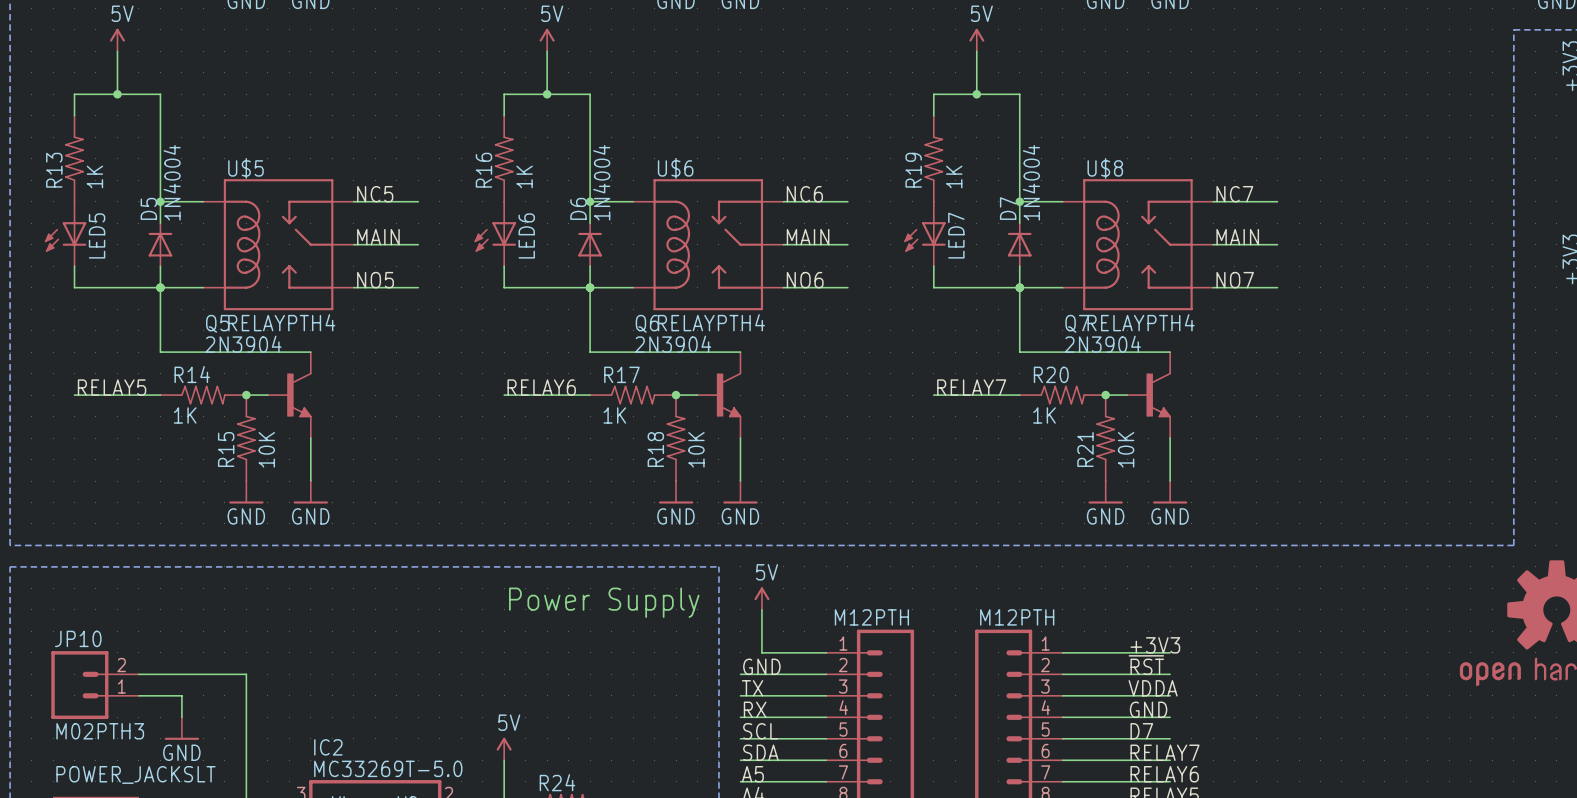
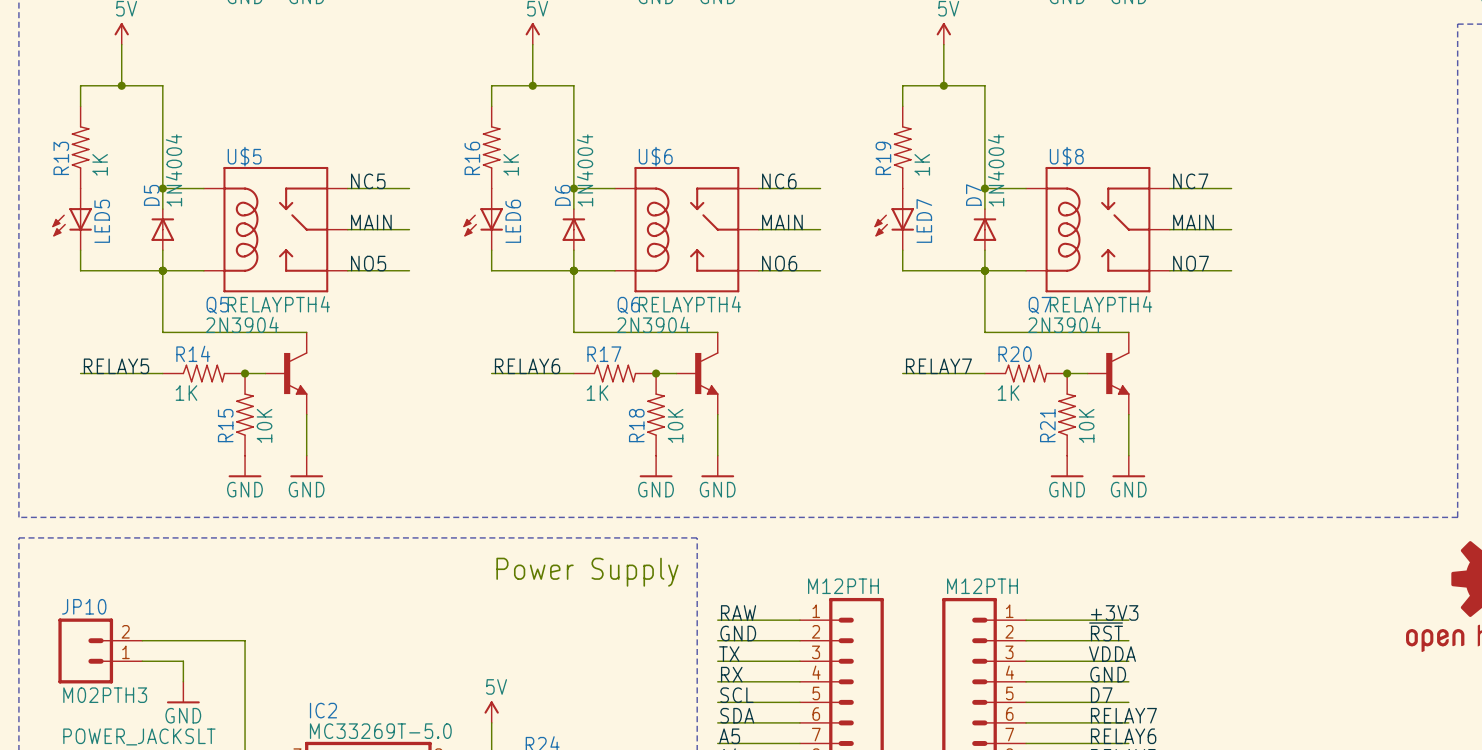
power symbol: 5V (761, 598) -> none
wire: (761, 609) (761, 652) -> (717, 620) (738, 620)
label: none -> RAW (738, 612)

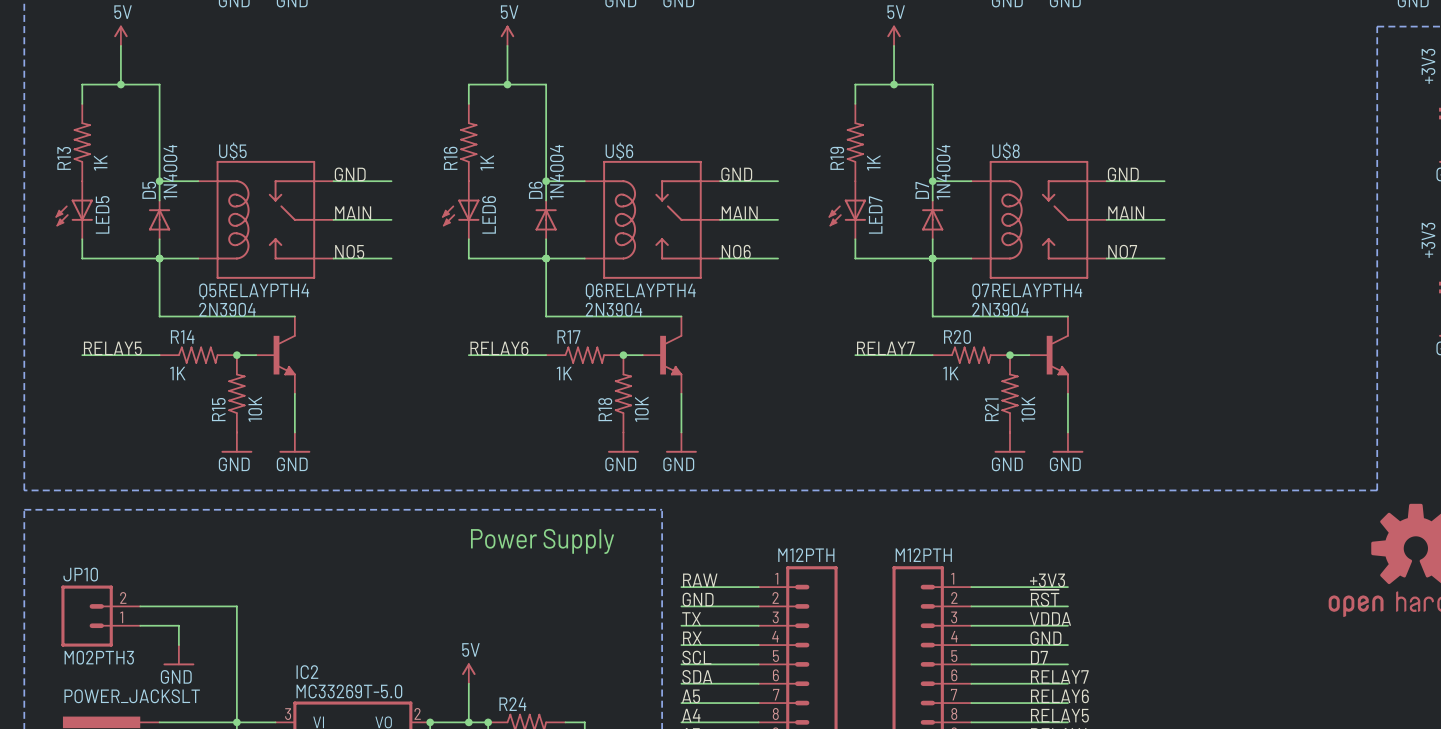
label: NC5 (368, 181) -> GND (350, 174)
label: NC6 (779, 181) -> GND (736, 174)
label: NC7 (1190, 181) -> GND (1123, 174)

